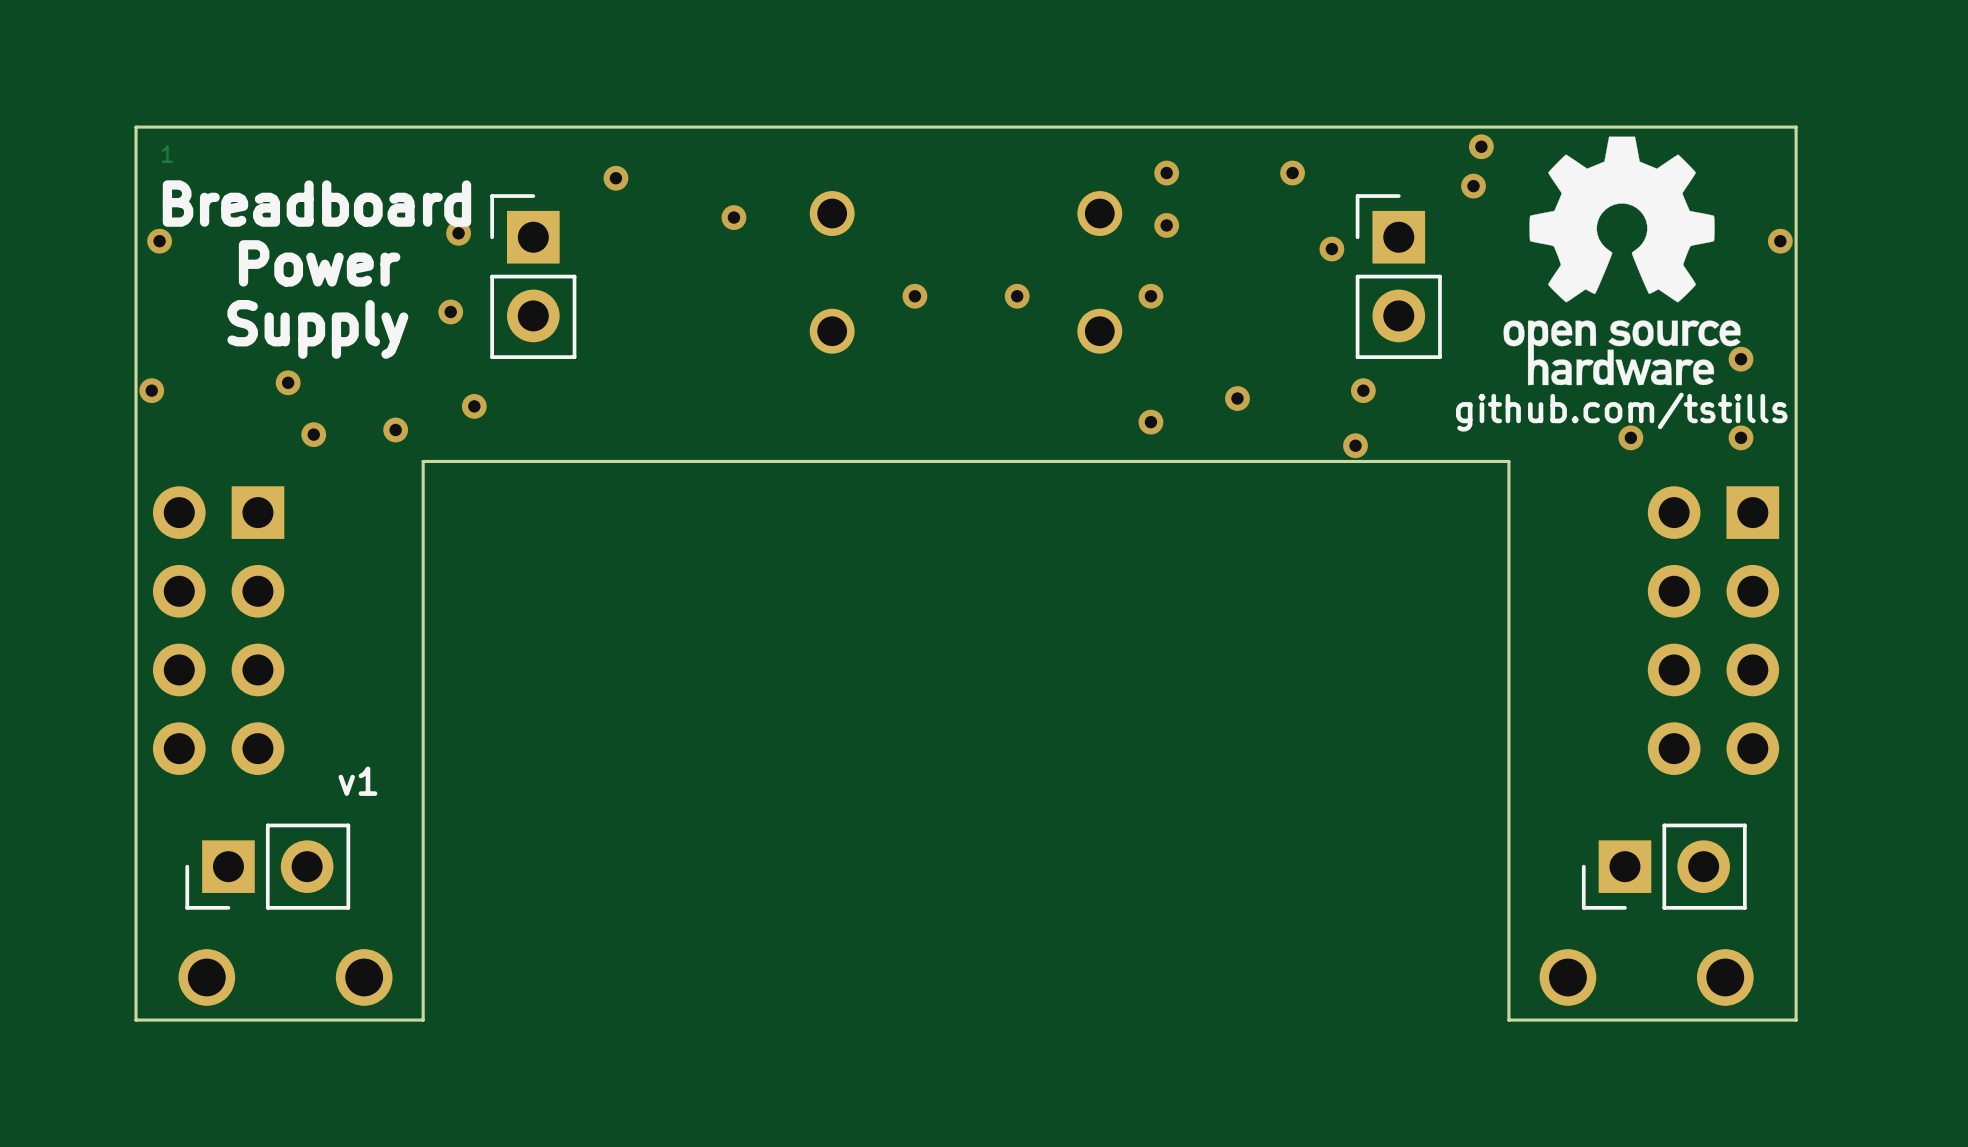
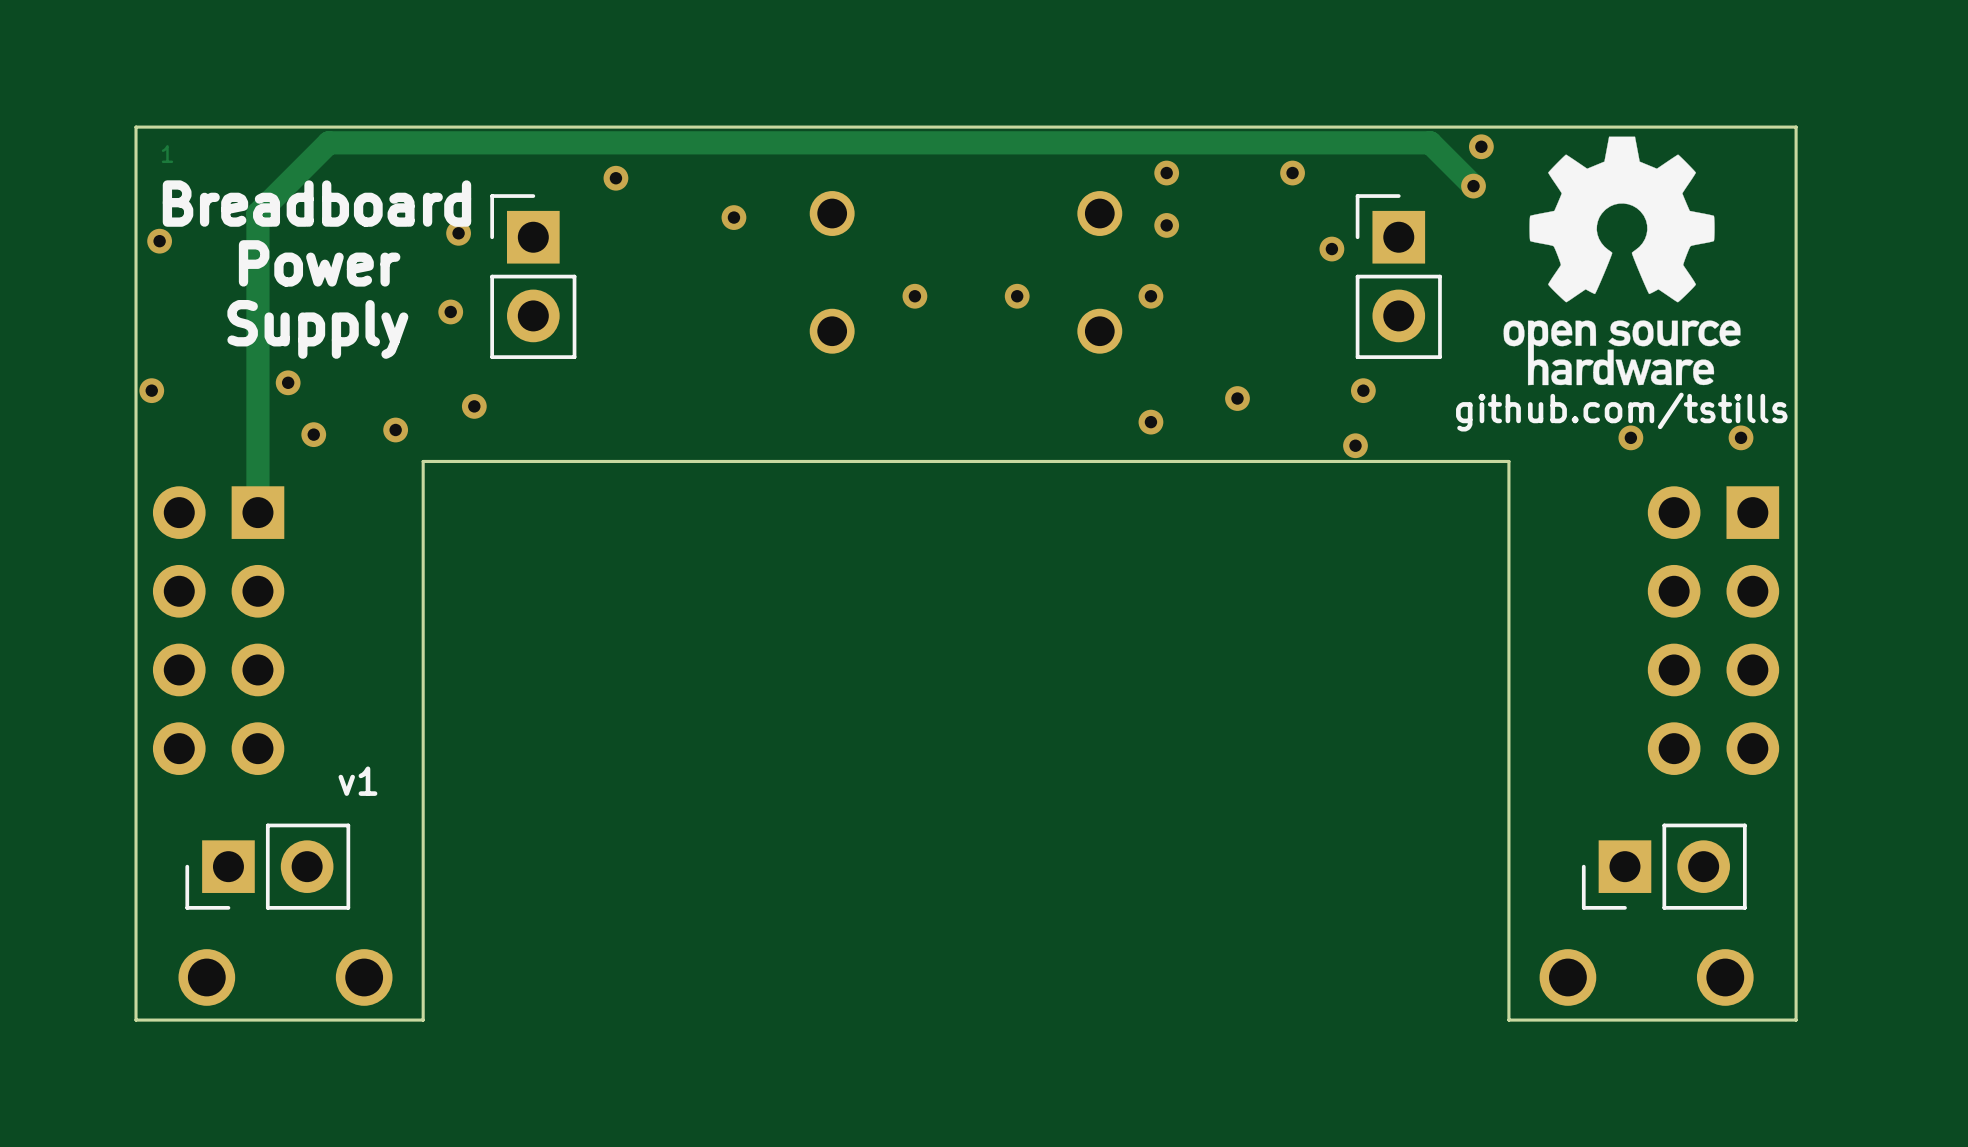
track: none -> (1473, 186) (1430, 142) (328, 142) (257, 213) (257, 512)
via: (1780, 241) -> none
via: (1741, 359) -> none

